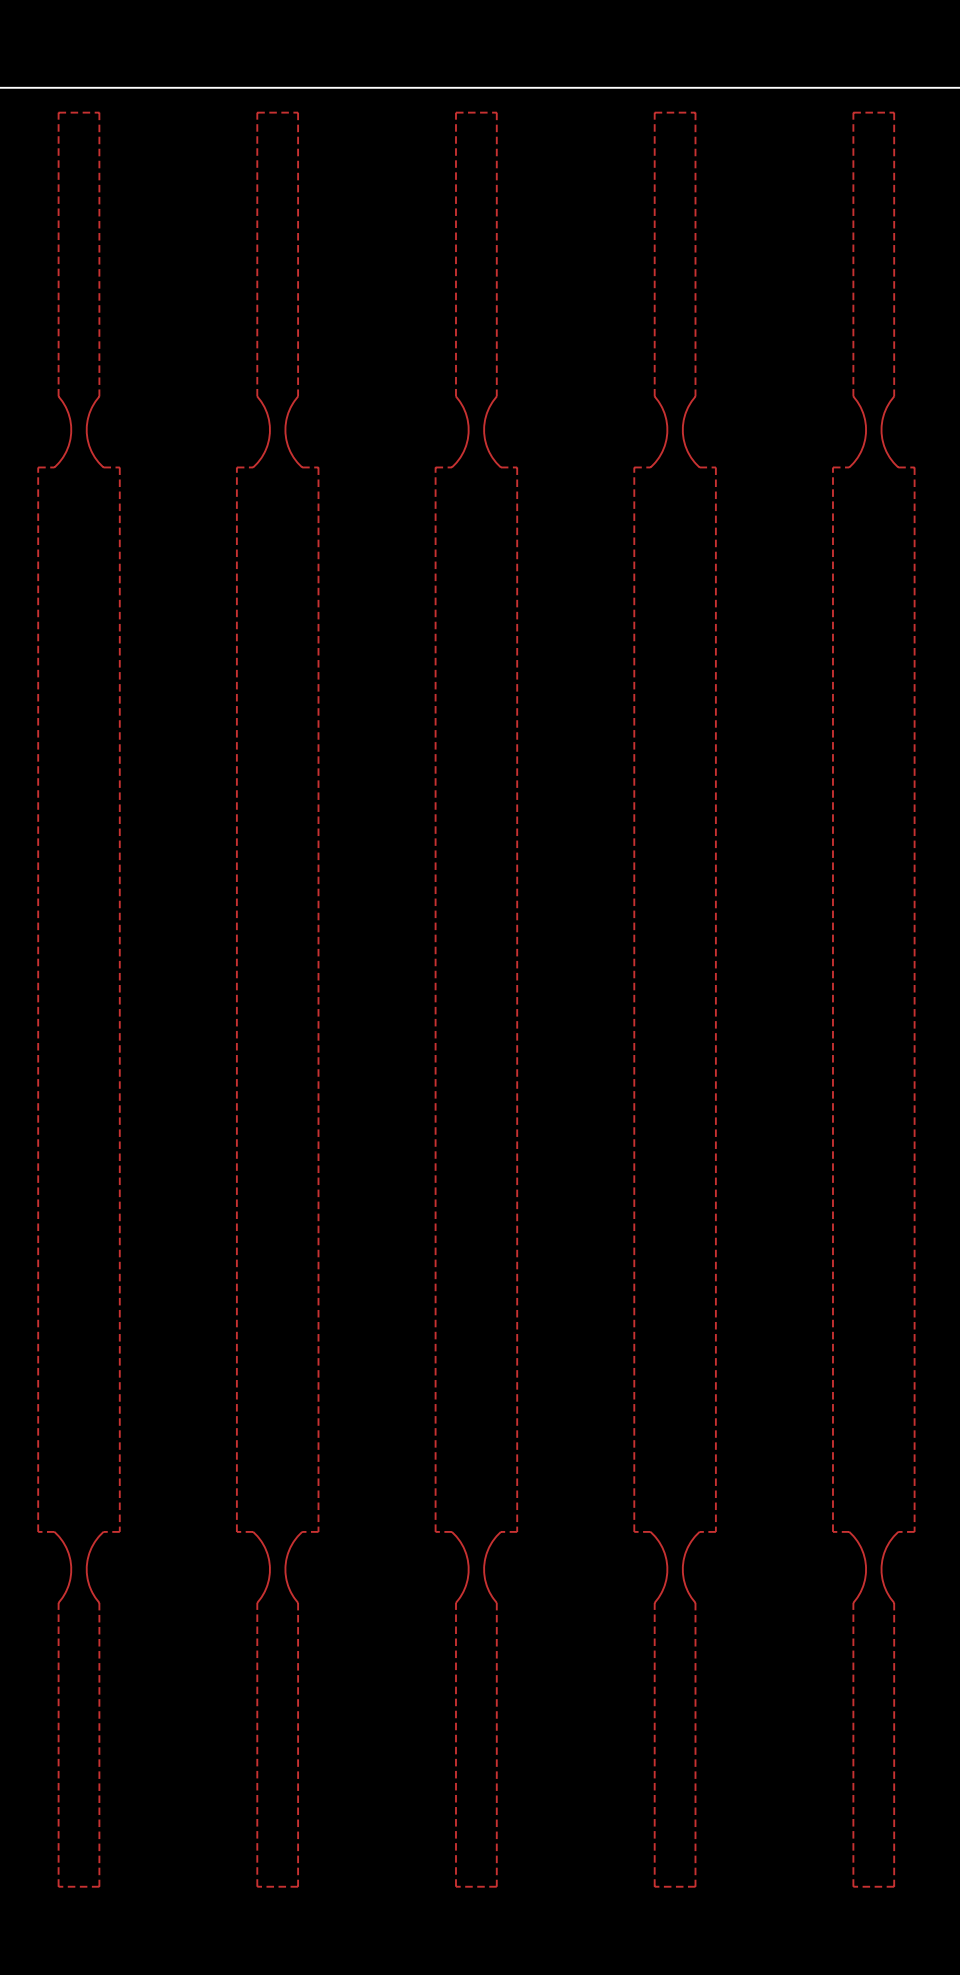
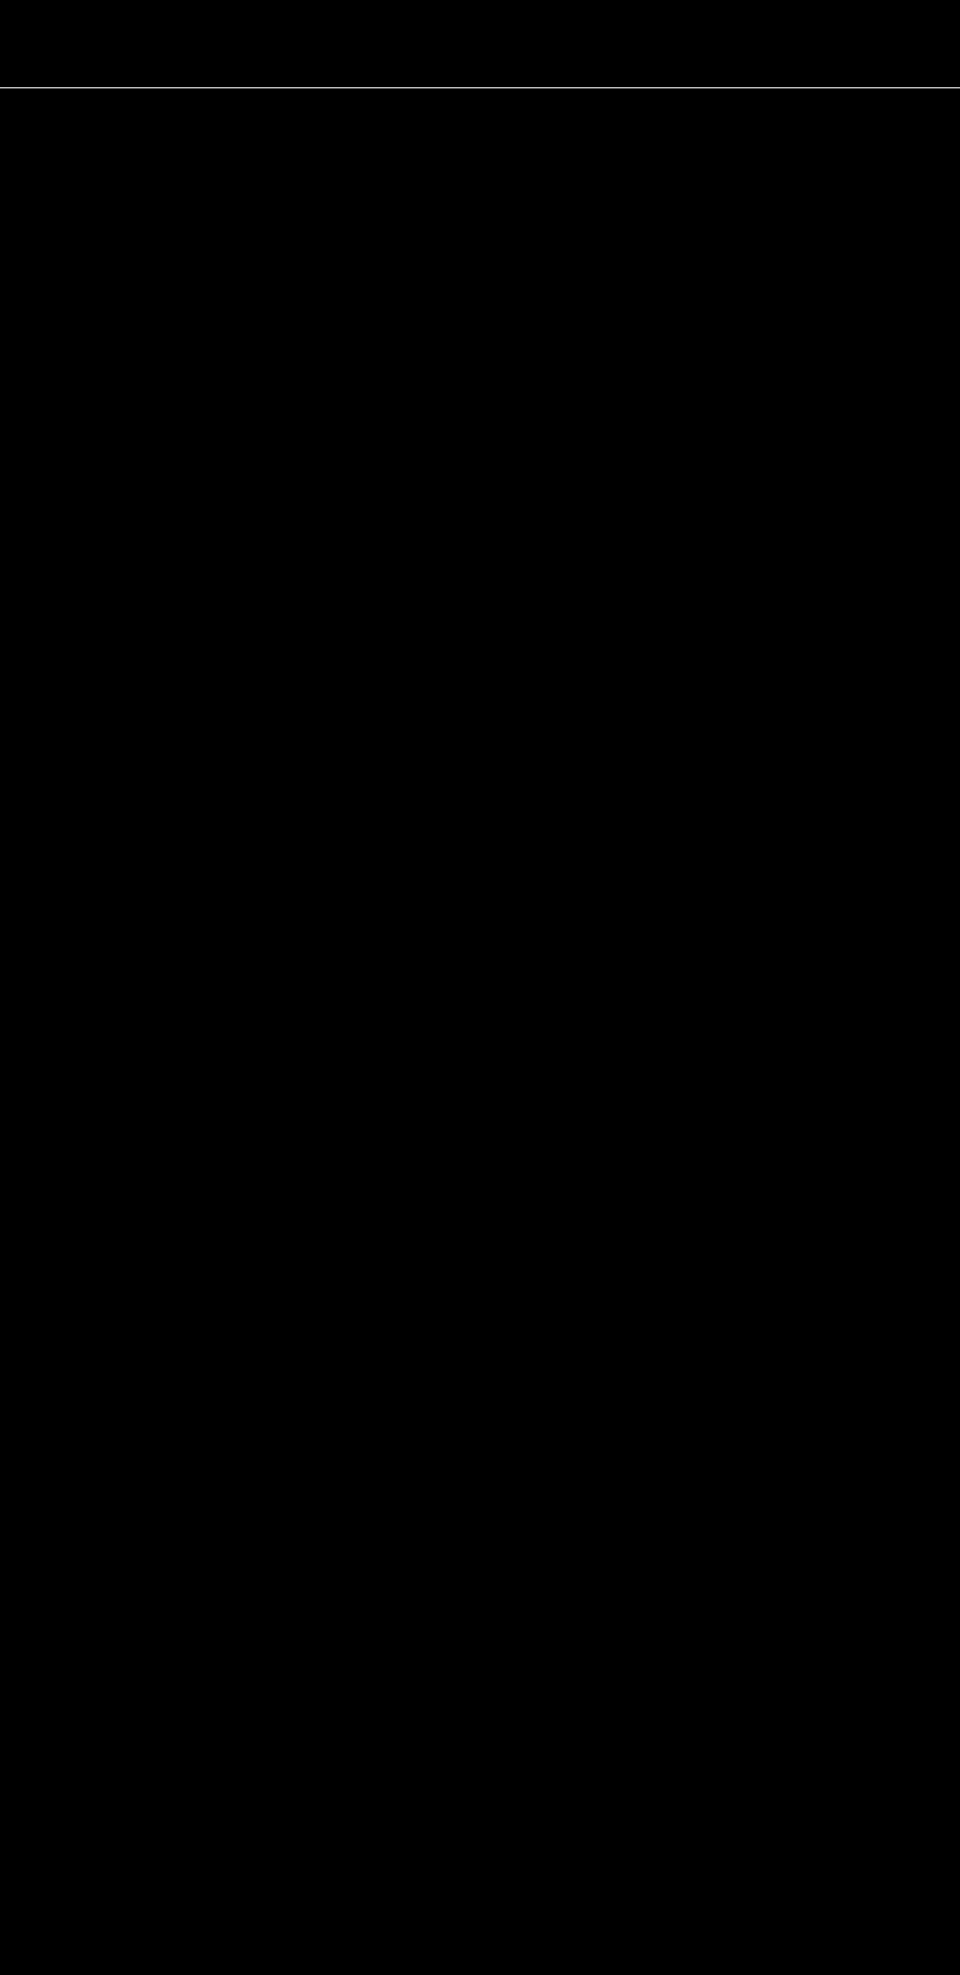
zone outline: (58, 112) (99, 112) (99, 396) (89, 413) (86, 432) (89, 445) (98, 462) (103, 467) (119, 467) (119, 1531) (103, 1531) (98, 1536) (89, 1553) (86, 1566) (89, 1585) (99, 1602) (99, 1886) (58, 1886) (58, 1602) (68, 1585) (71, 1566) (68, 1553) (59, 1536) (54, 1531) (38, 1531) (38, 467) (54, 467) (59, 462) (68, 445) (71, 432) (68, 413) (58, 396) (58, 112) -> none
zone outline: (257, 112) (298, 112) (298, 396) (288, 413) (285, 432) (290, 451) (297, 462) (302, 467) (318, 467) (318, 1531) (302, 1531) (297, 1536) (287, 1553) (285, 1566) (288, 1585) (298, 1602) (298, 1886) (257, 1886) (257, 1602) (267, 1585) (269, 1566) (267, 1553) (257, 1536) (253, 1531) (236, 1531) (236, 467) (253, 467) (257, 462) (267, 445) (269, 432) (267, 413) (257, 396) (257, 112) -> none
zone outline: (455, 112) (496, 112) (496, 396) (486, 413) (484, 432) (486, 445) (496, 462) (500, 467) (517, 467) (517, 1531) (500, 1531) (496, 1536) (486, 1553) (484, 1566) (486, 1585) (496, 1602) (496, 1886) (455, 1886) (455, 1602) (465, 1585) (468, 1566) (466, 1553) (456, 1536) (451, 1531) (435, 1531) (435, 467) (451, 467) (456, 462) (466, 445) (468, 432) (465, 413) (455, 396) (455, 112) -> none
zone outline: (654, 112) (695, 112) (695, 396) (685, 413) (682, 432) (685, 445) (694, 462) (699, 467) (715, 467) (715, 1531) (699, 1531) (694, 1536) (687, 1547) (682, 1566) (685, 1585) (695, 1602) (695, 1886) (654, 1886) (654, 1602) (664, 1585) (667, 1566) (662, 1547) (655, 1536) (650, 1531) (634, 1531) (634, 467) (650, 467) (655, 462) (664, 445) (667, 432) (664, 413) (654, 396) (654, 112) -> none
zone outline: (853, 112) (894, 112) (894, 396) (884, 413) (881, 432) (883, 445) (893, 462) (898, 467) (914, 467) (914, 1531) (898, 1531) (893, 1536) (886, 1547) (881, 1566) (884, 1585) (894, 1602) (894, 1886) (853, 1886) (853, 1602) (863, 1585) (866, 1566) (861, 1547) (853, 1536) (849, 1531) (832, 1531) (832, 467) (849, 467) (853, 462) (863, 445) (866, 432) (863, 413) (853, 396) (853, 112) -> none

